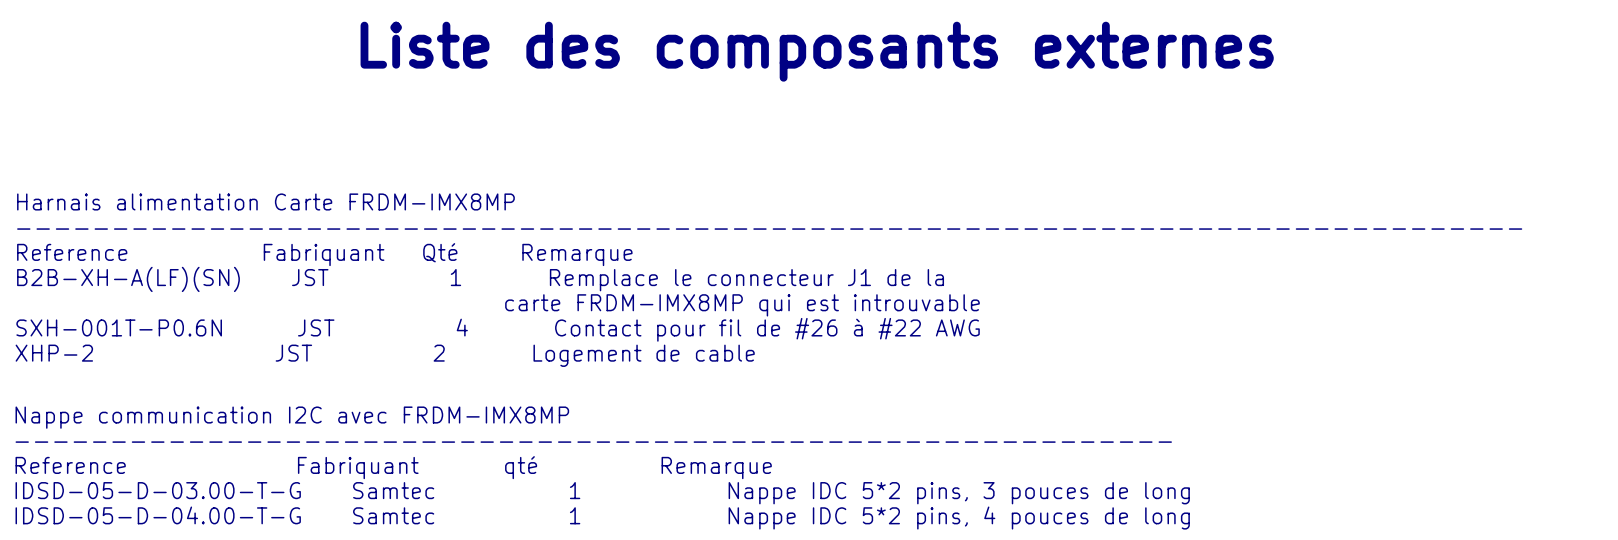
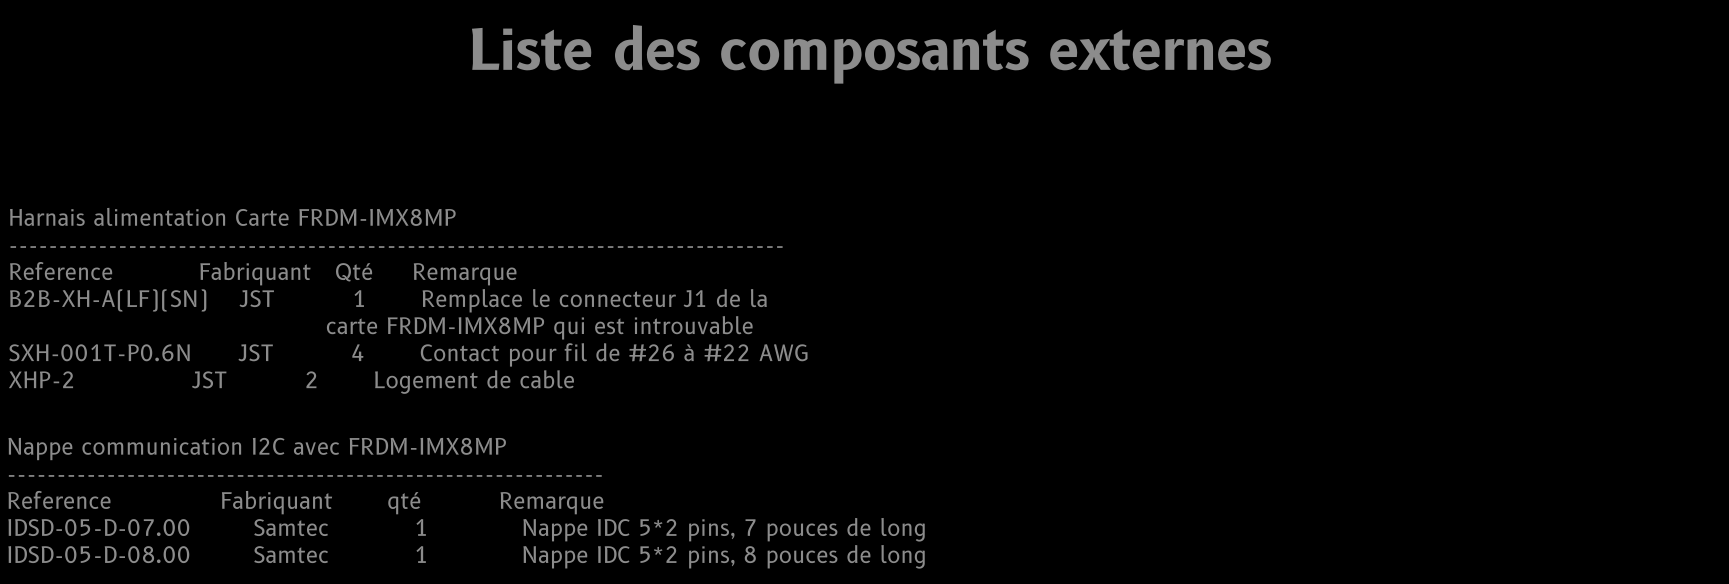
text: IDSD-05-D-03.00-T-G Samtec 1 Nappe IDC 5*2 pins, 3 pouces de long (602, 493) -> IDSD-05-D-07.00 Samtec 1 Nappe IDC 5*2 pins, 7 pouces de long (466, 529)
text: IDSD-05-D-04.00-T-G Samtec 1 Nappe IDC 5*2 pins, 4 pouces de long (602, 518) -> IDSD-05-D-08.00 Samtec 1 Nappe IDC 5*2 pins, 8 pouces de long (466, 556)

